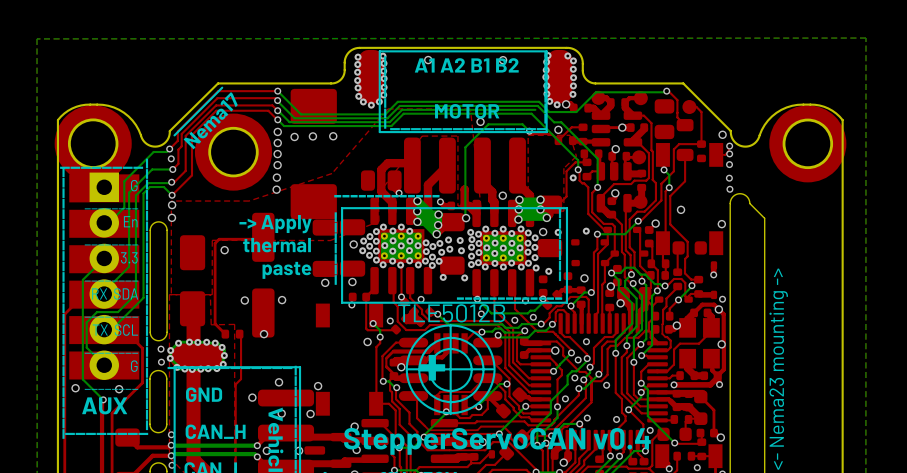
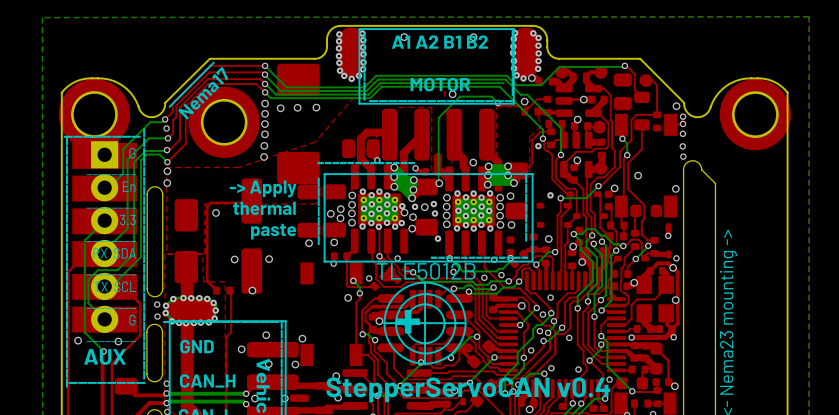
via: none -> (352, 195)
via: (376, 231) -> none
via: (470, 232) -> none
via: (528, 232) -> none
via: (558, 232) -> none
via: none -> (446, 197)
via: none -> (500, 197)
via: (478, 234) -> none
via: (369, 236) -> none
via: (535, 237) -> none
via: (448, 239) -> none
via: (471, 239) -> none
via: (363, 241) -> none
via: none -> (352, 204)
via: (376, 241) -> none
via: none -> (424, 207)
via: none -> (446, 206)
via: (478, 243) -> none
via: (528, 243) -> none
via: none -> (500, 206)
via: (353, 244) -> none
via: none -> (340, 209)
via: (369, 246) -> none
via: (432, 246) -> none
via: (471, 247) -> none
via: (534, 247) -> none
via: none -> (404, 212)
via: (449, 249) -> none
via: (362, 250) -> none
via: none -> (351, 213)
via: none -> (330, 213)
via: (376, 251) -> none
via: (426, 251) -> none
via: (441, 252) -> none
via: (478, 252) -> none
via: (528, 252) -> none
via: none -> (446, 215)
via: none -> (500, 215)
via: none -> (412, 217)
via: none -> (340, 218)
via: (369, 255) -> none
via: (471, 256) -> none
via: (432, 257) -> none
via: (535, 257) -> none
via: none -> (352, 222)
via: (376, 260) -> none
via: (439, 261) -> none
via: none -> (446, 224)
via: (478, 262) -> none
via: (528, 263) -> none
via: none -> (500, 224)
via: none -> (511, 224)
via: (471, 264) -> none
via: (432, 265) -> none
via: none -> (412, 228)
via: (536, 267) -> none
via: (548, 271) -> none
via: (443, 277) -> none

